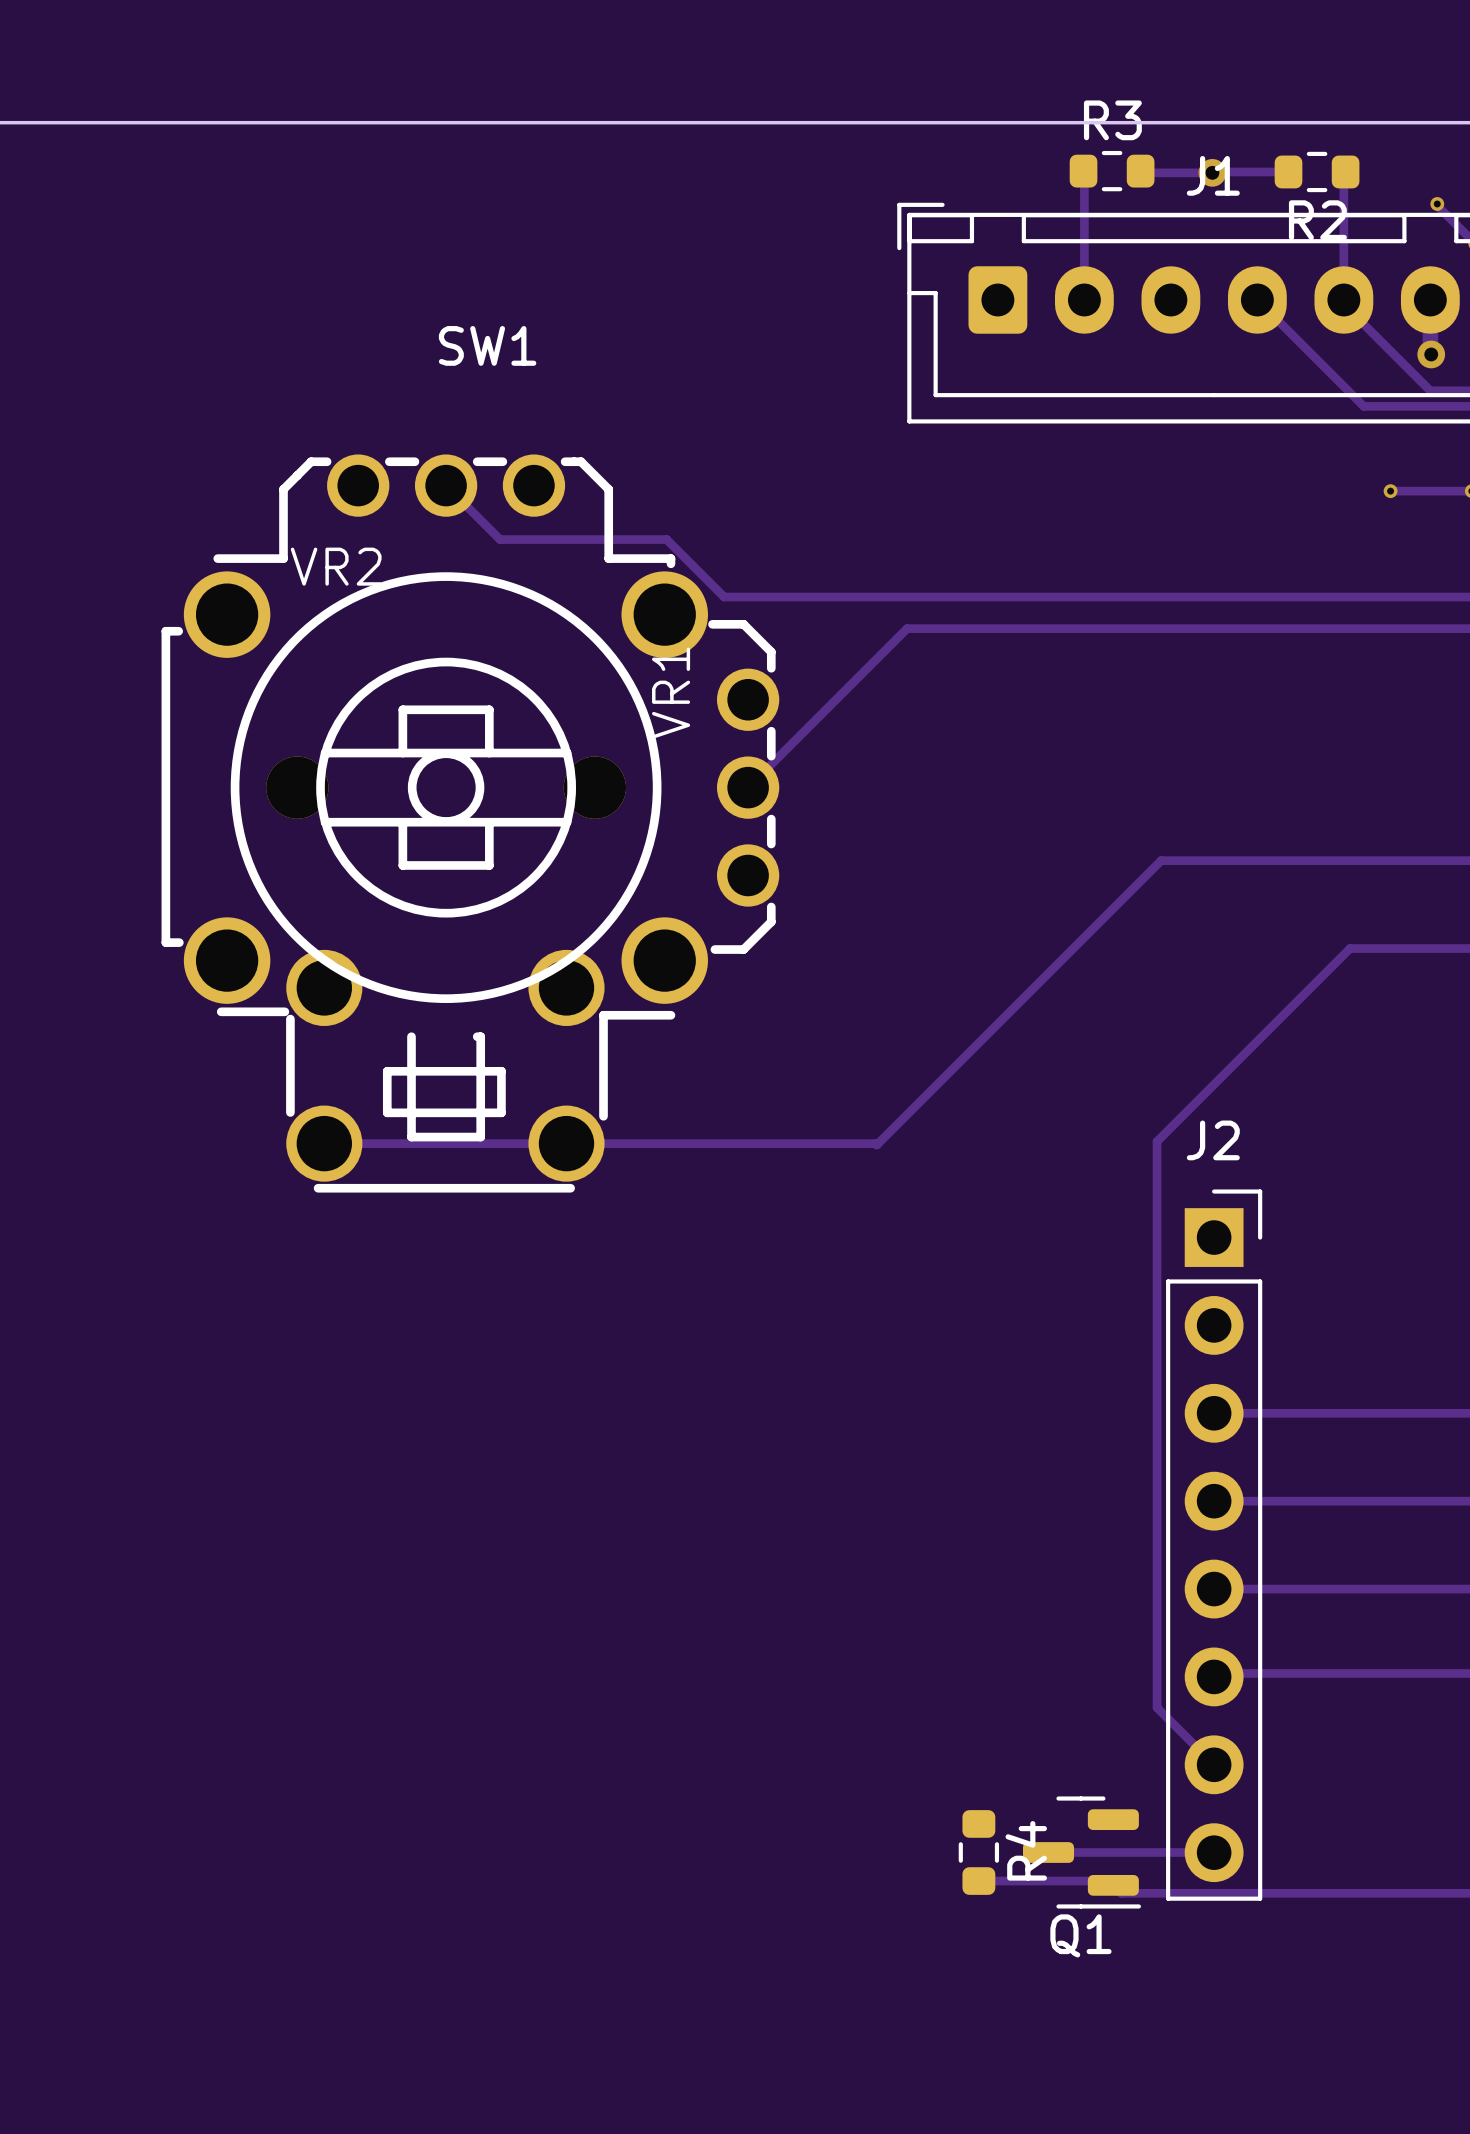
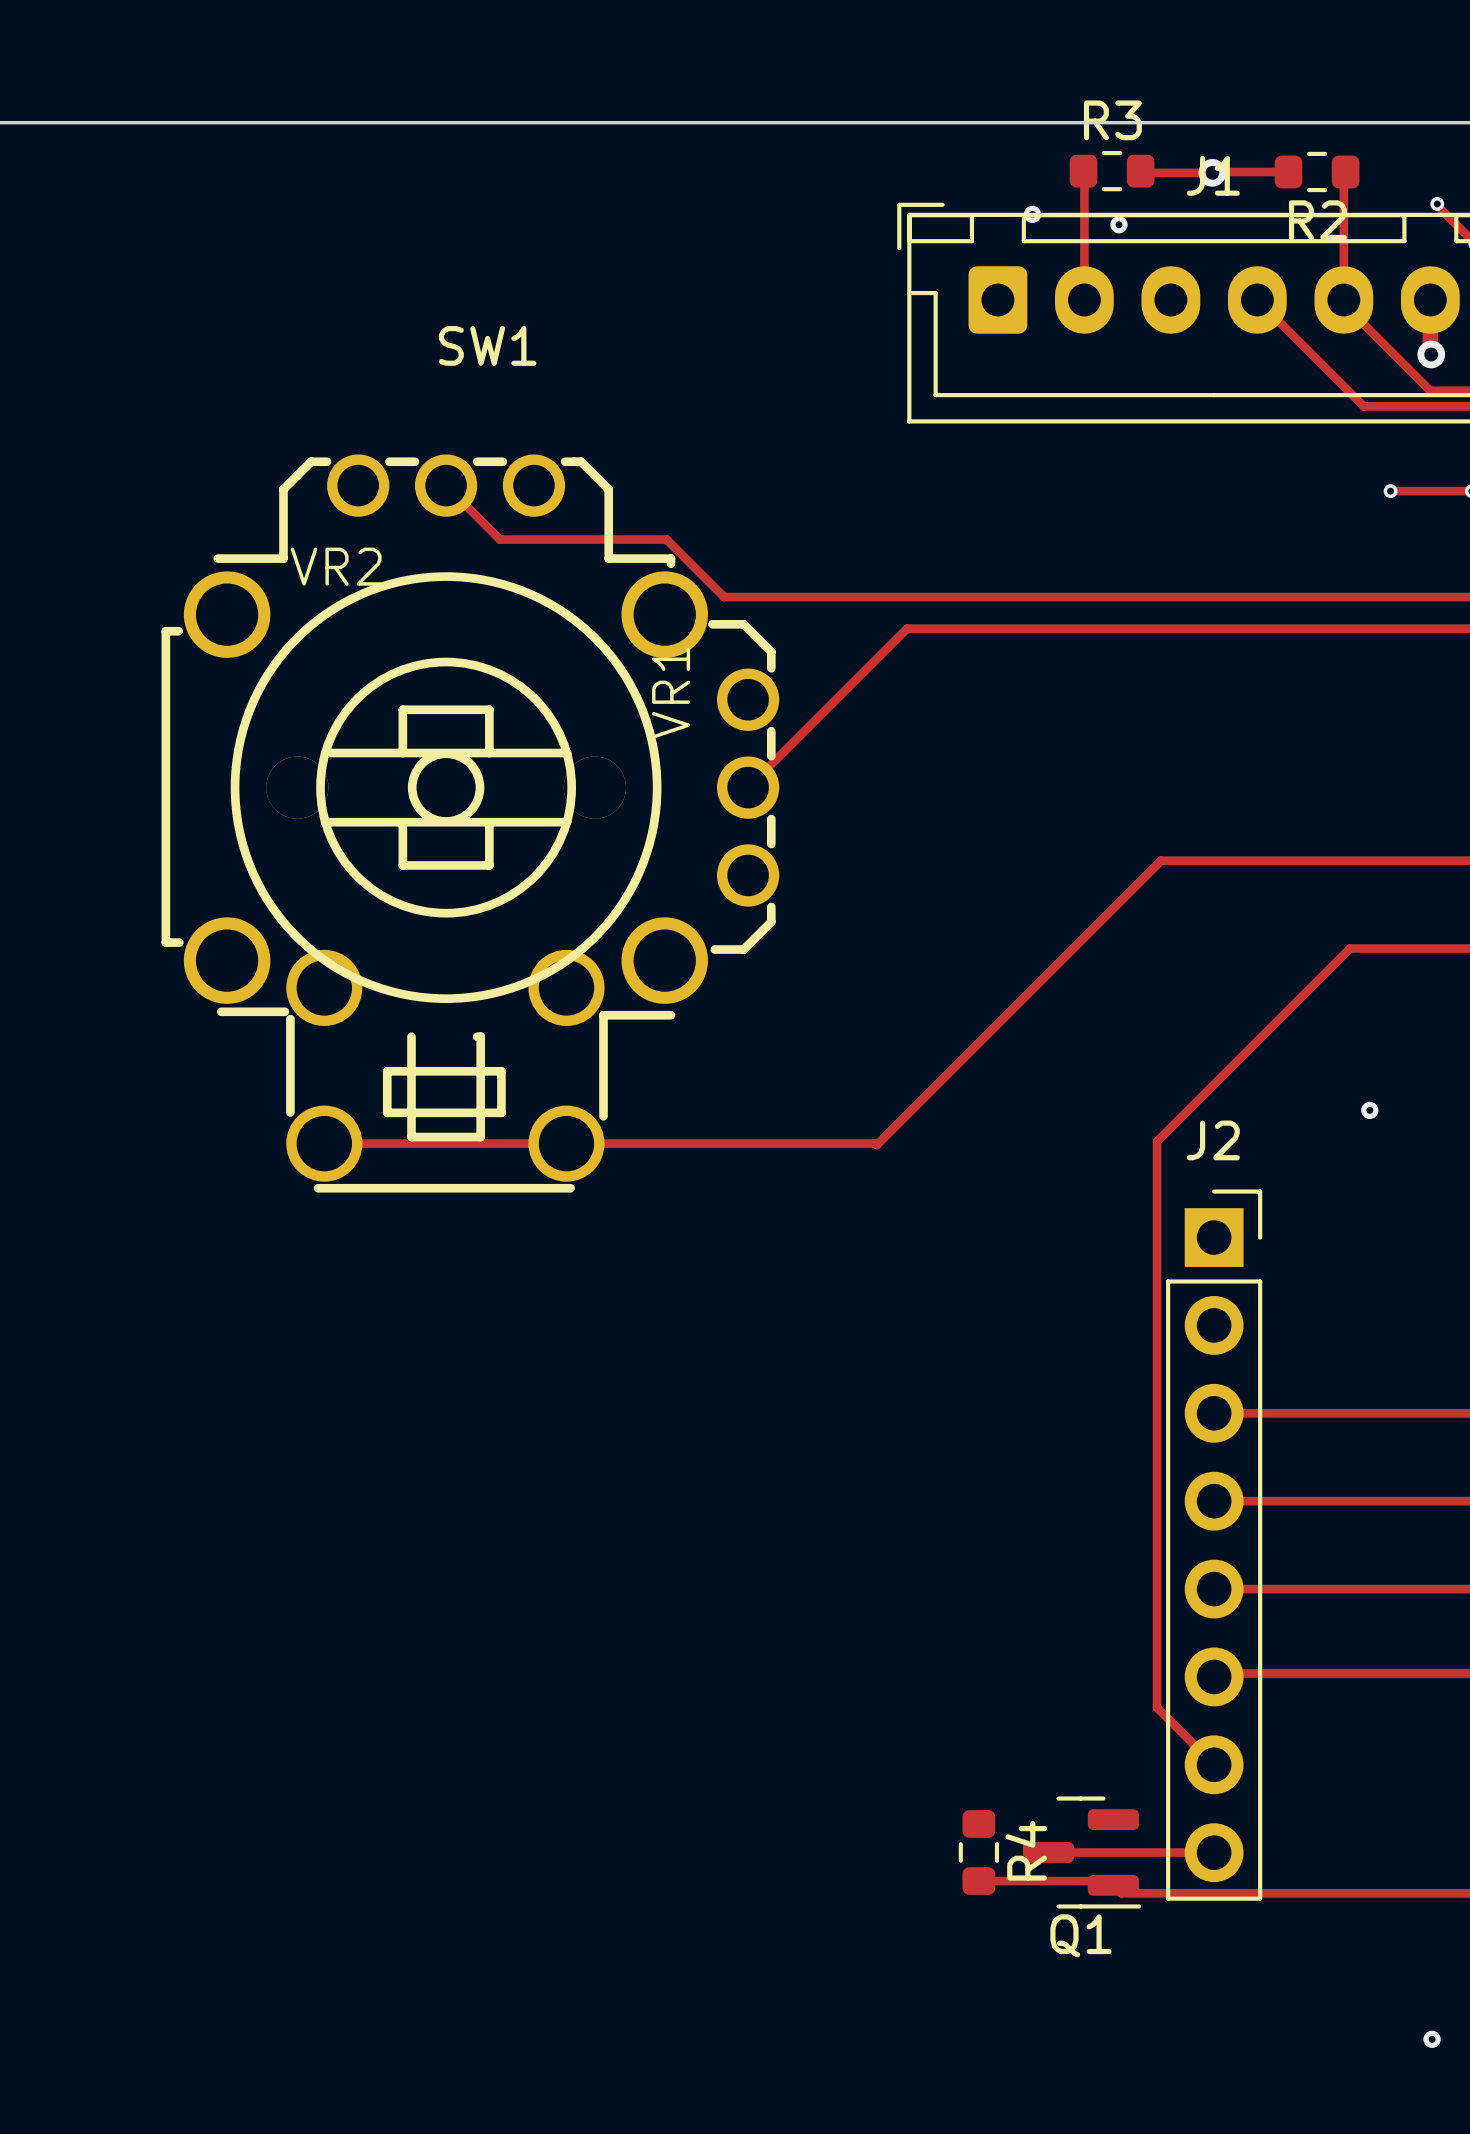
via: none -> (1032, 214)
via: none -> (1118, 224)
via: none -> (1369, 1110)
via: none -> (1432, 2039)

